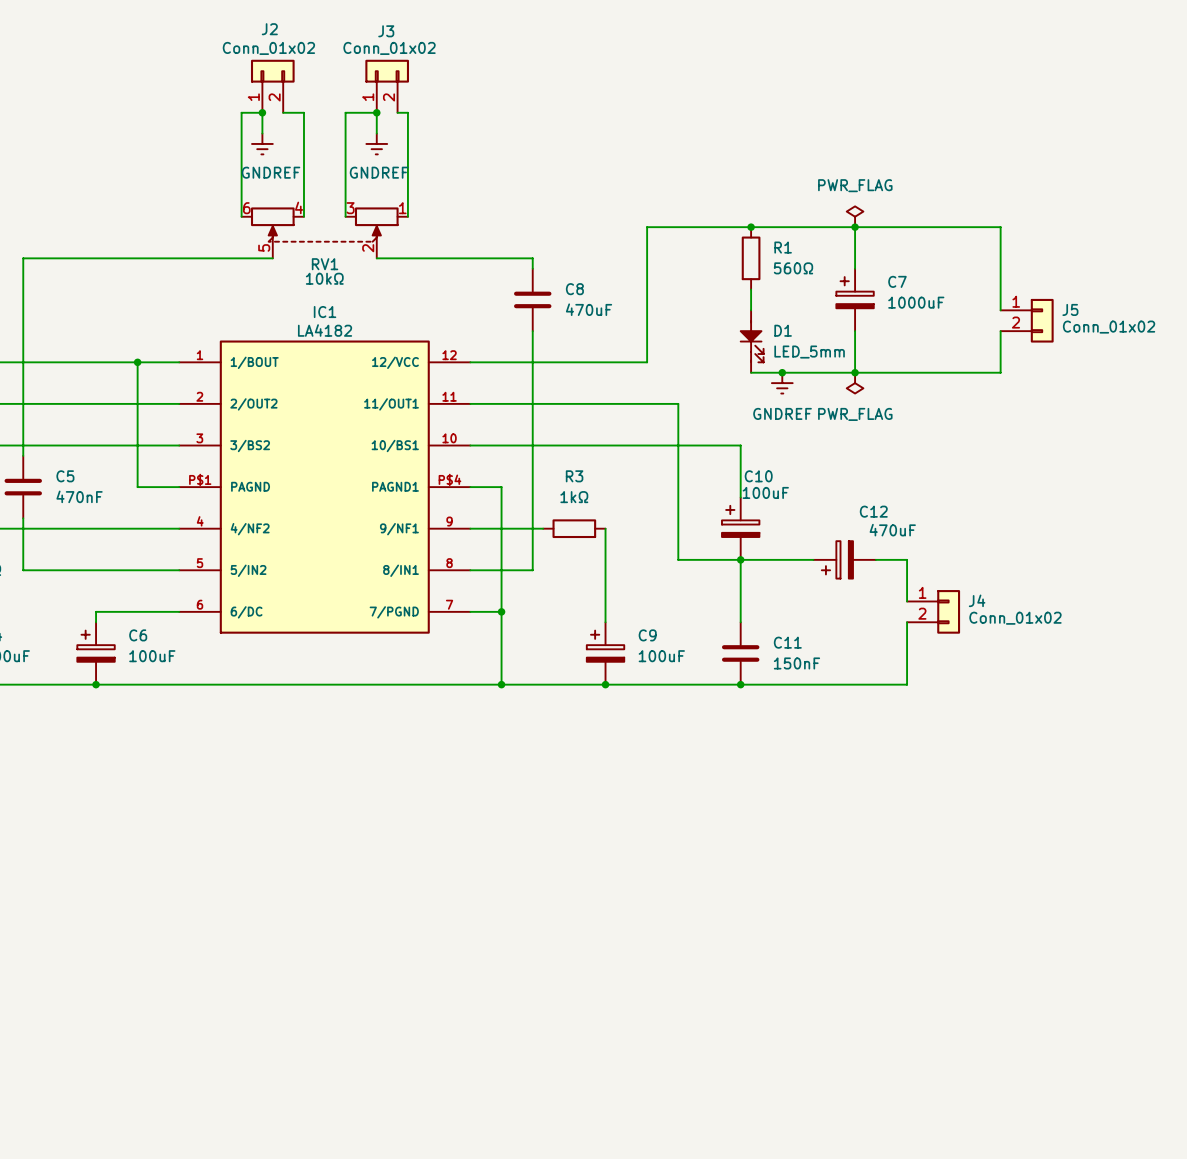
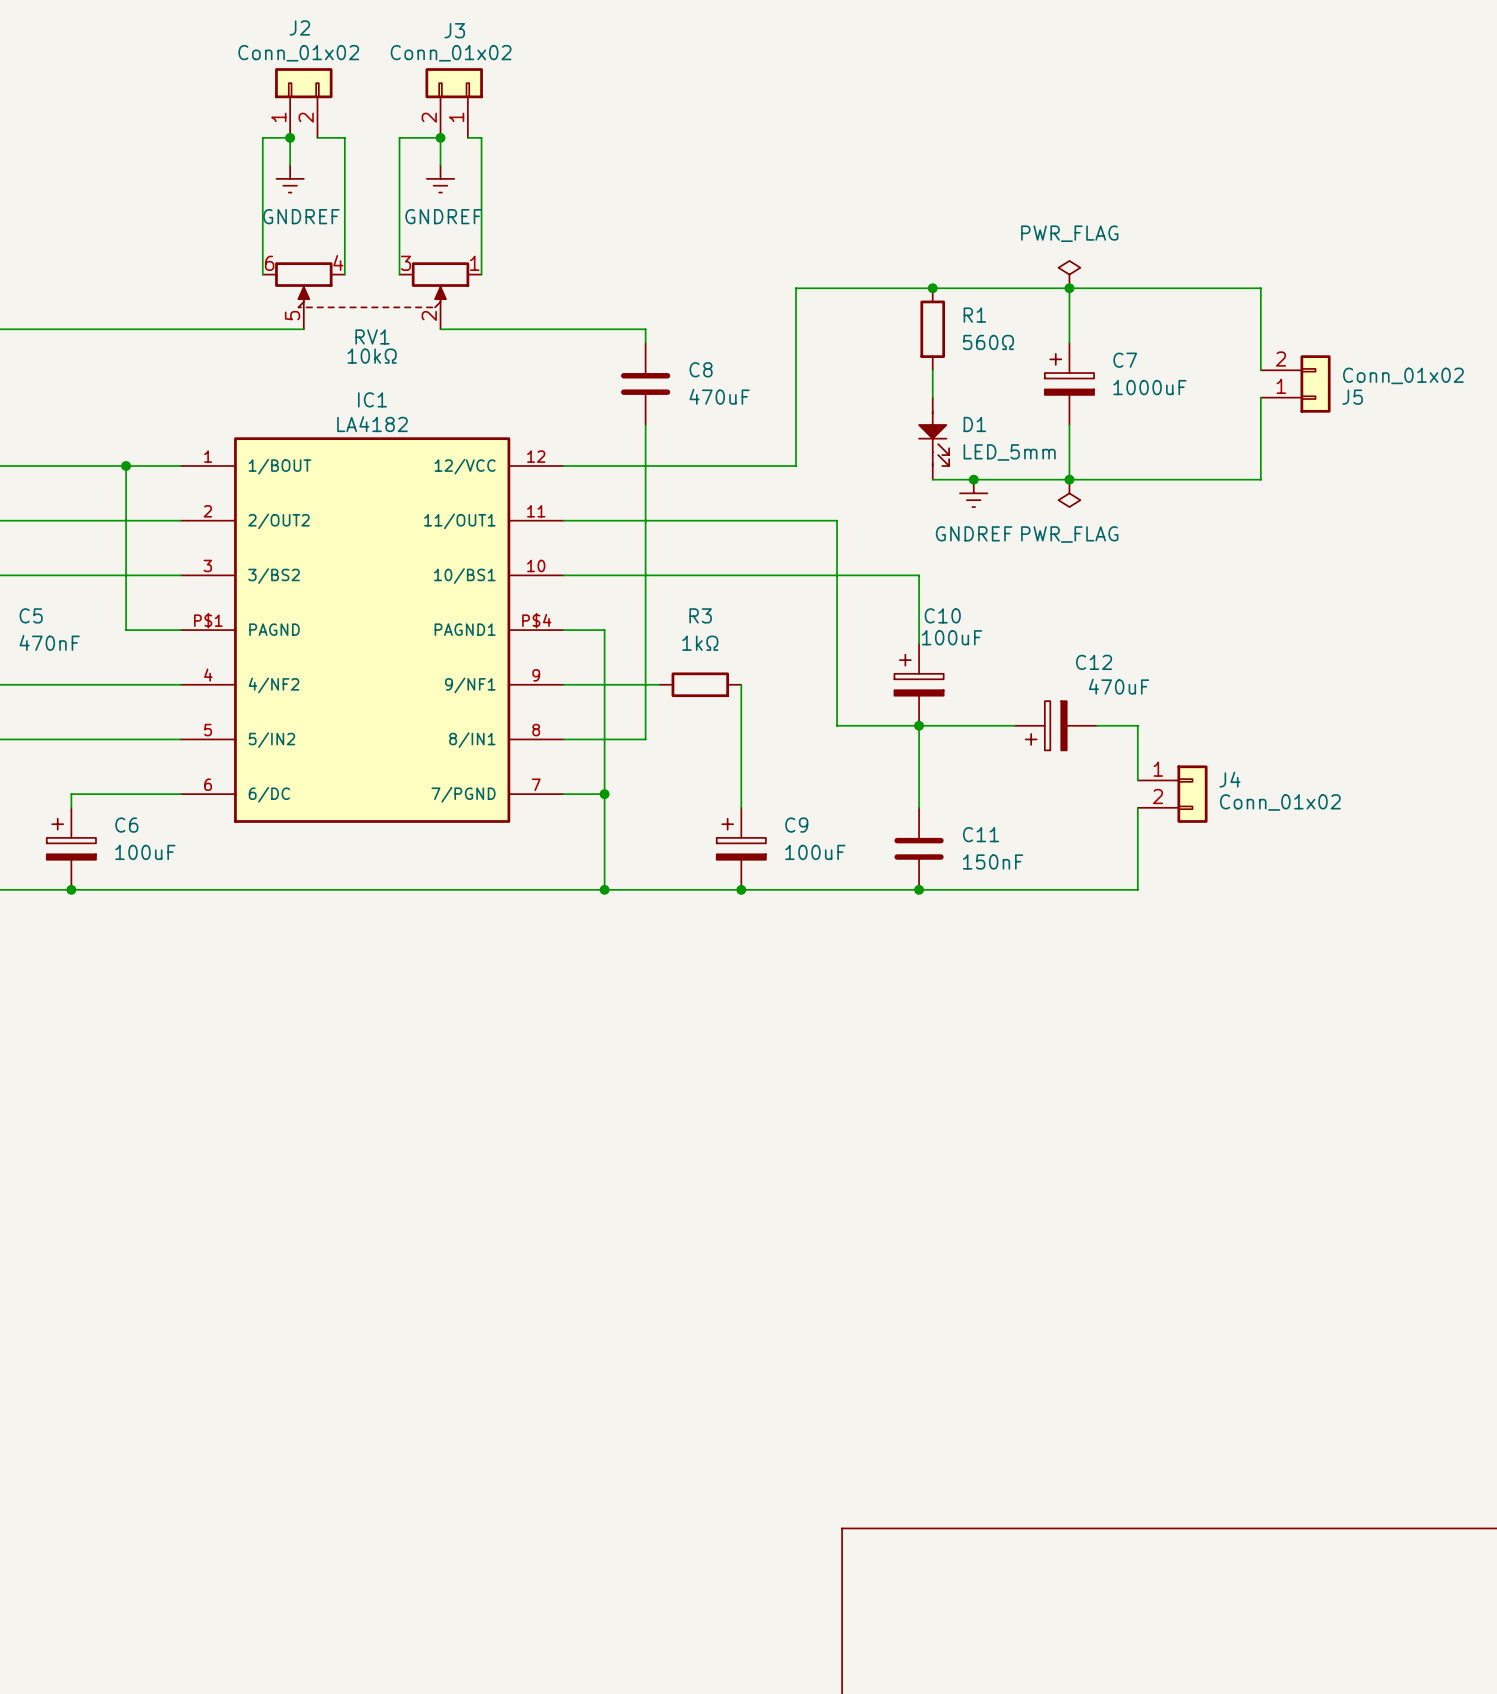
J3 flip: as is (387, 71) -> left-right (454, 83)
wire: (1000, 289) (1000, 310) -> (1260, 424) (1260, 397)
J5 flip: as is (1042, 320) -> up-down (1315, 383)

